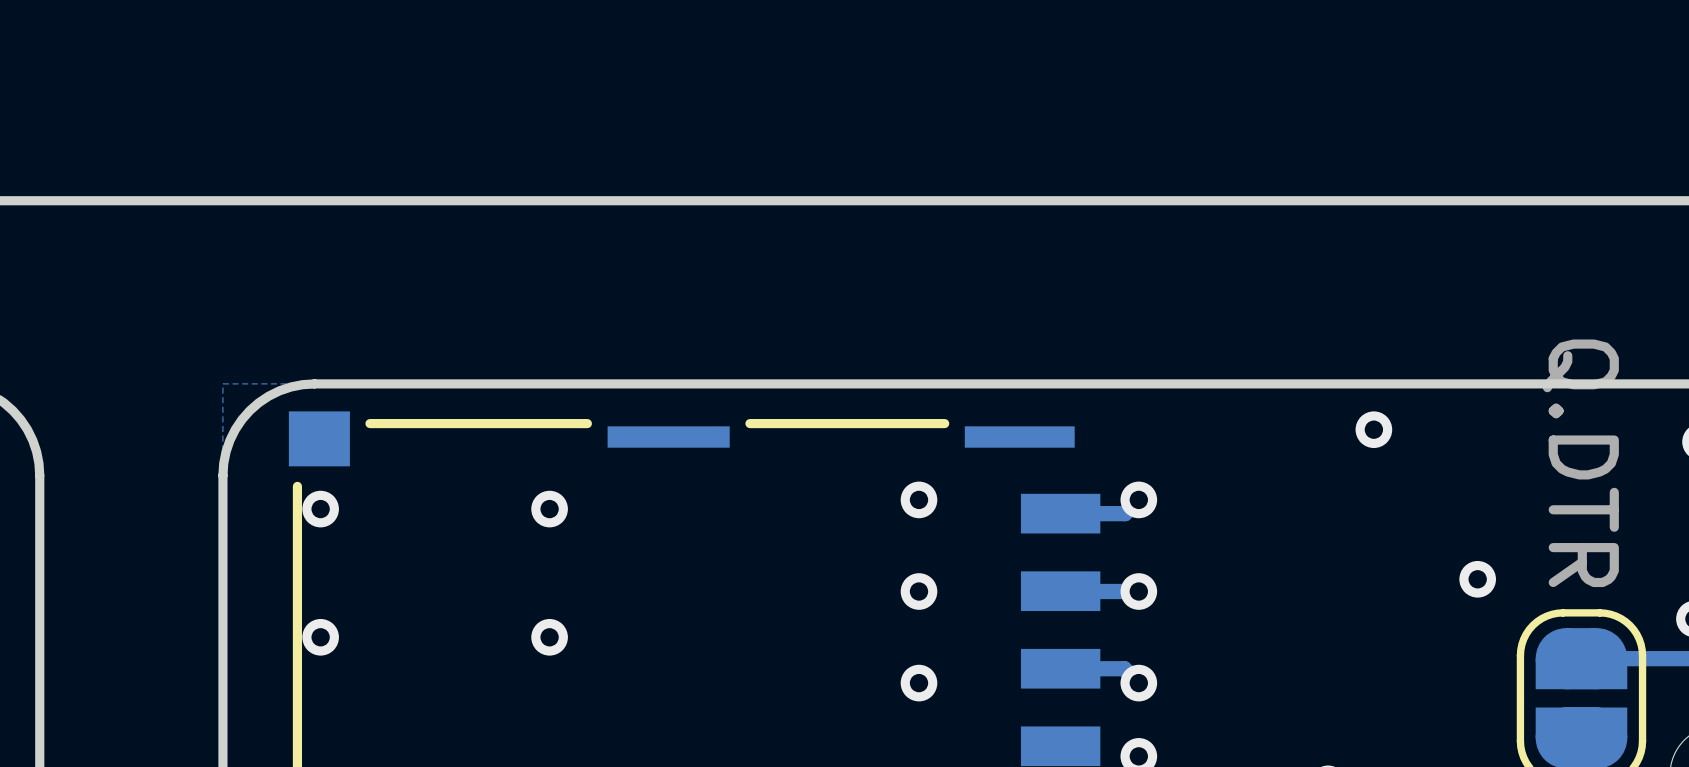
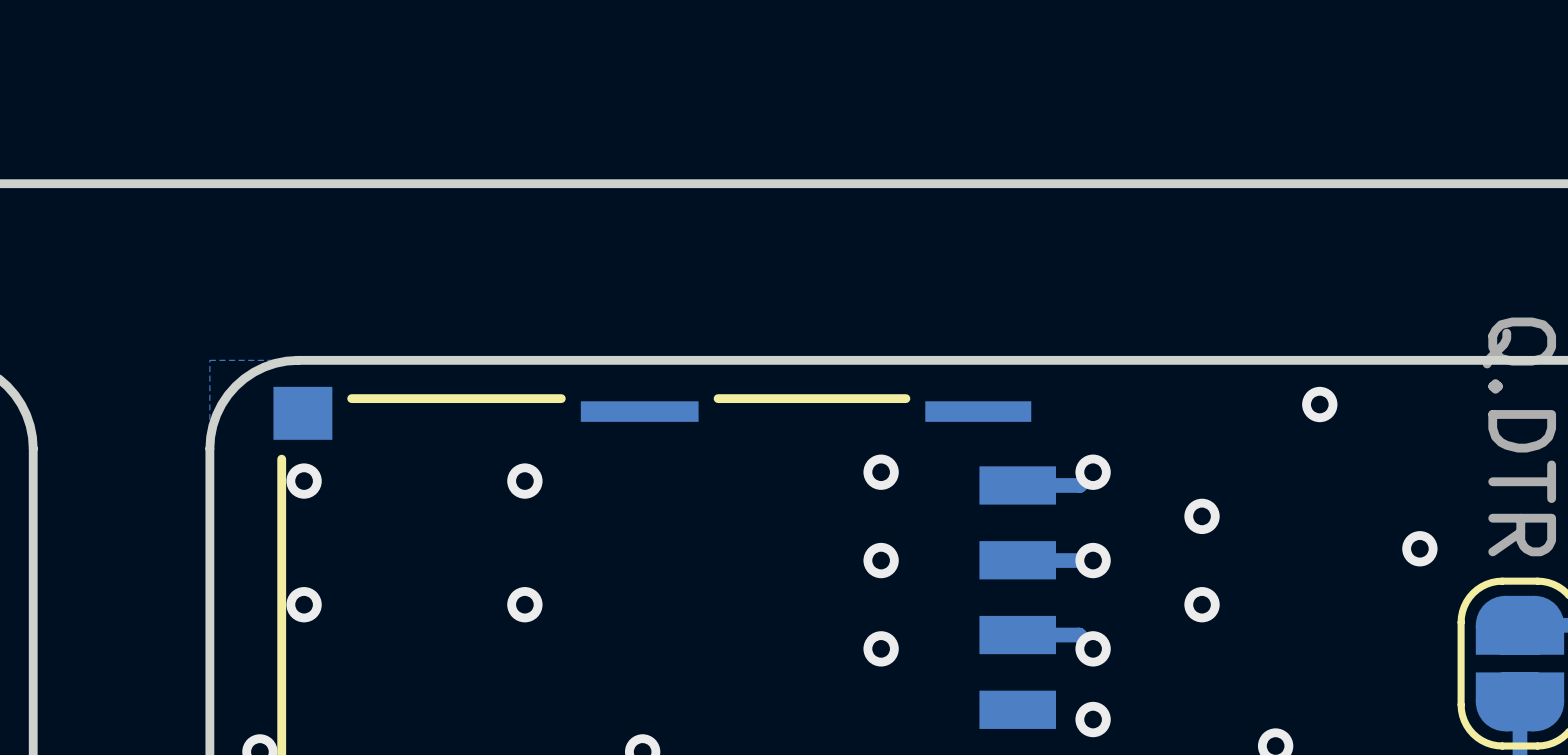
via: none -> (1202, 516)
via: none -> (1202, 604)

